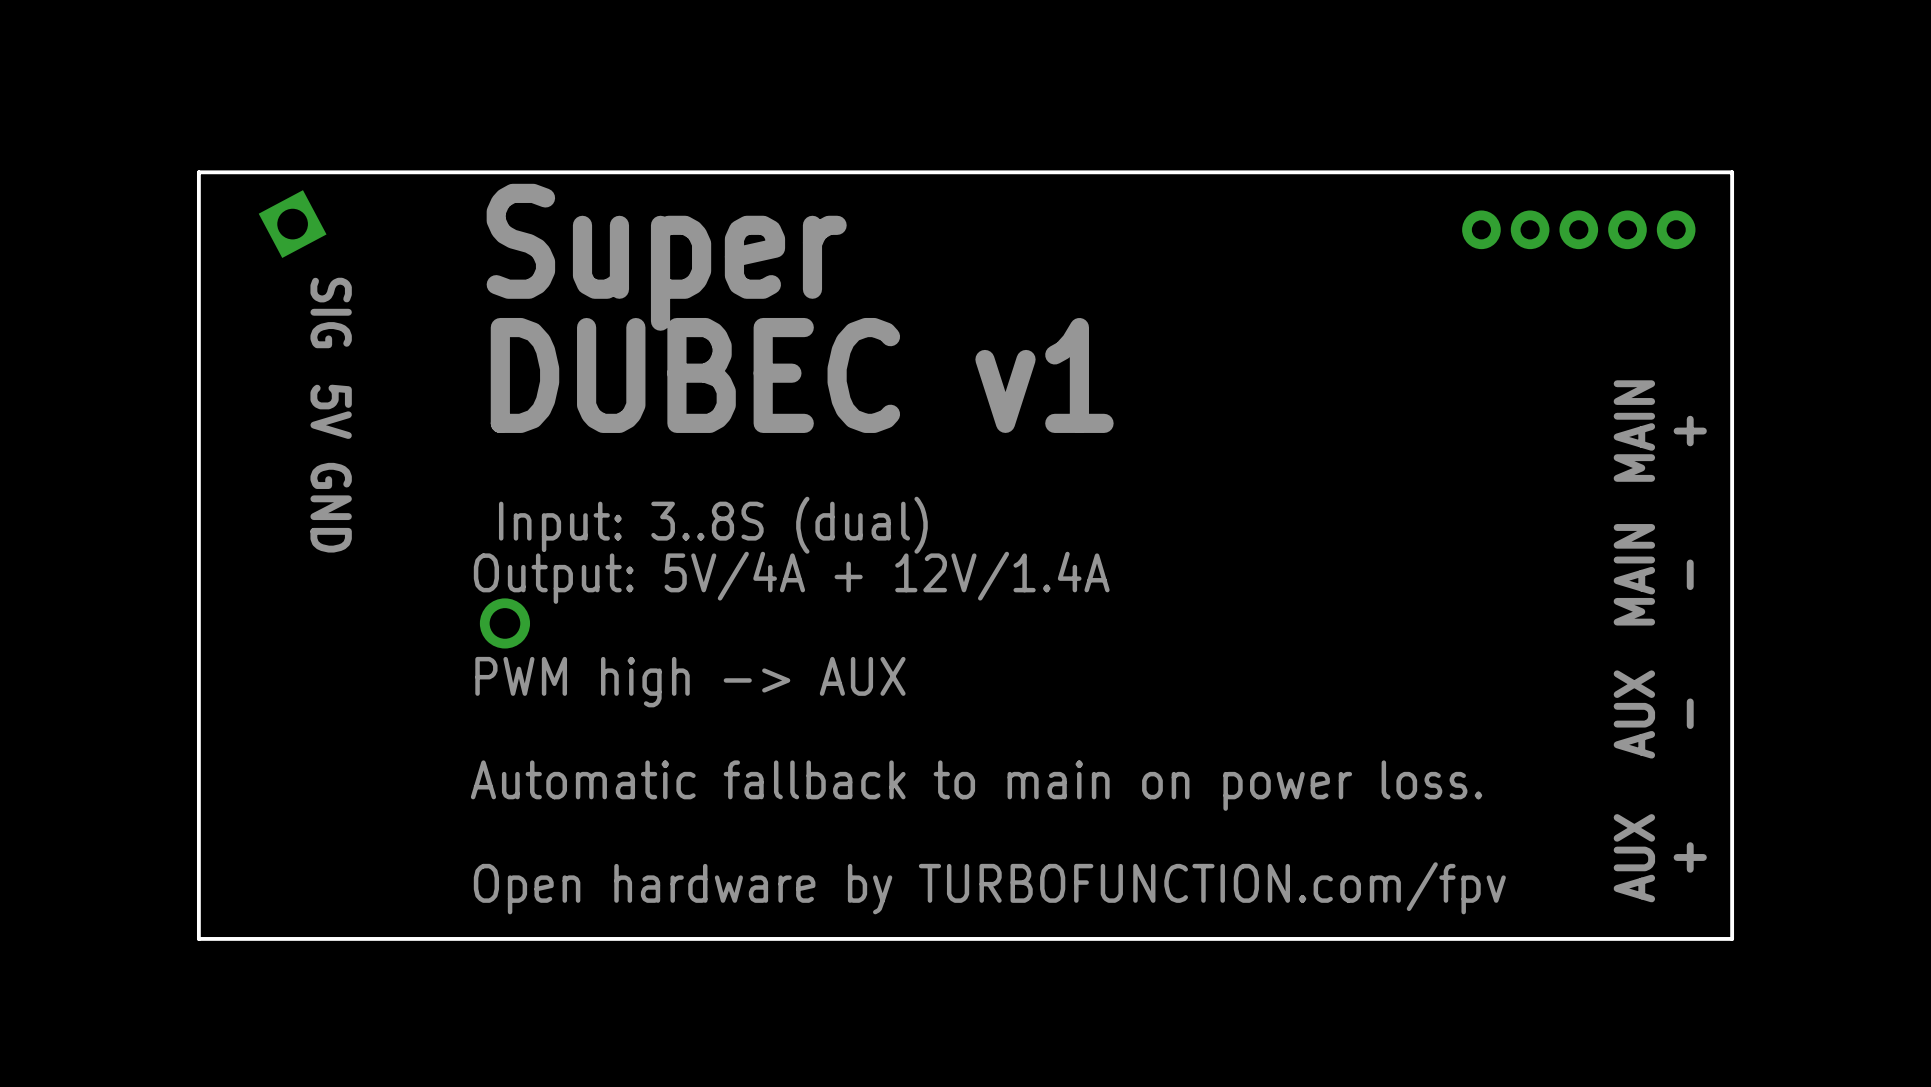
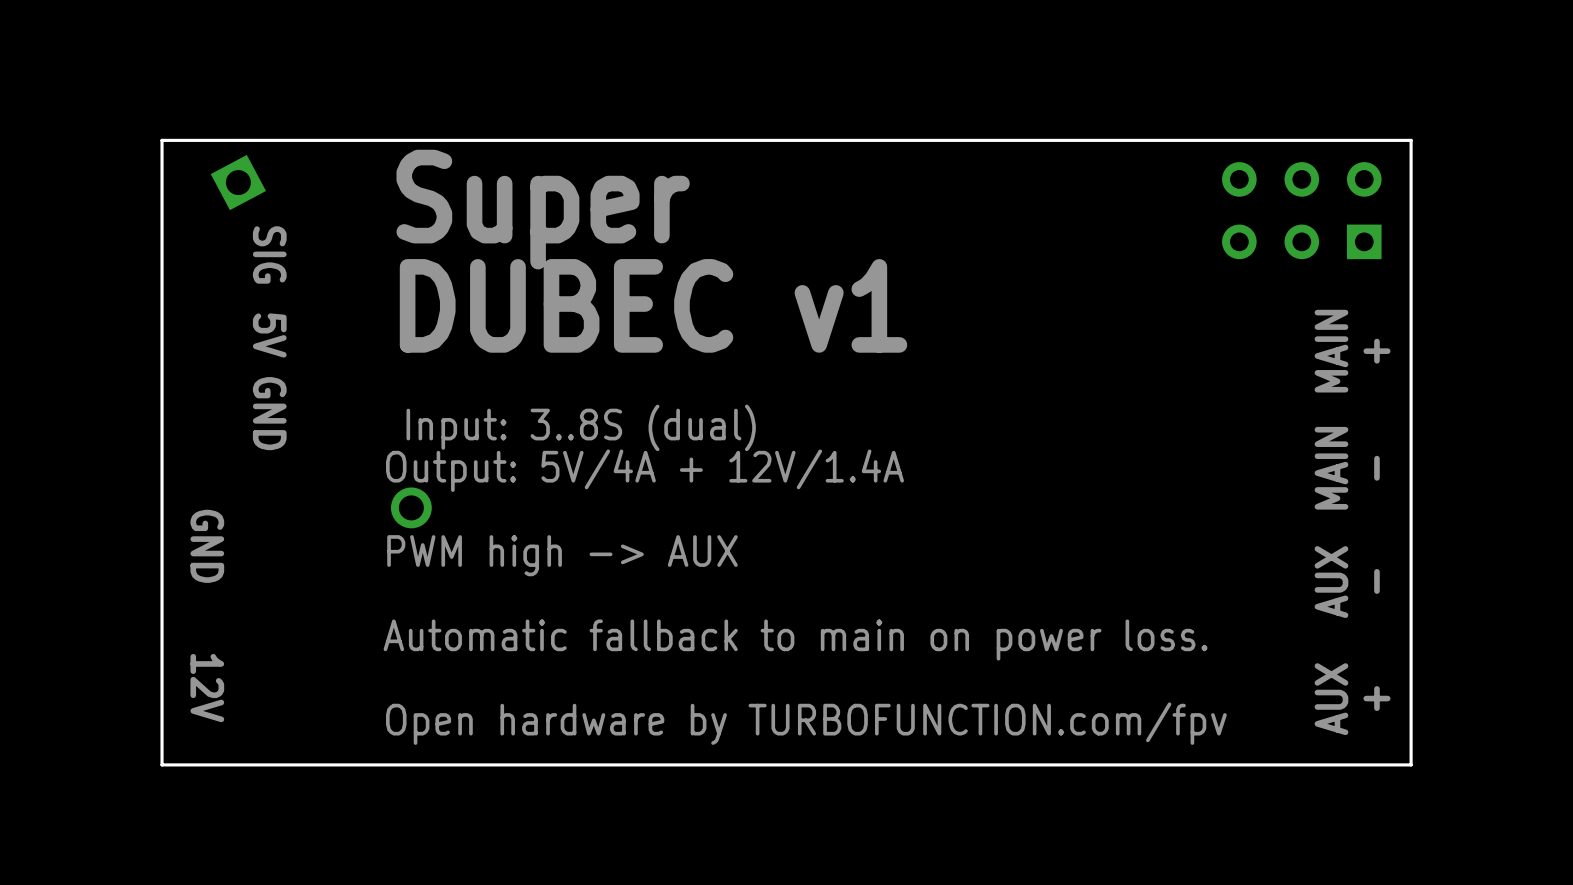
part footprint: [1462, 210, 1696, 250] -> [1222, 162, 1382, 260]
text: none -> GND (207, 546)
text: none -> 12V (207, 688)

